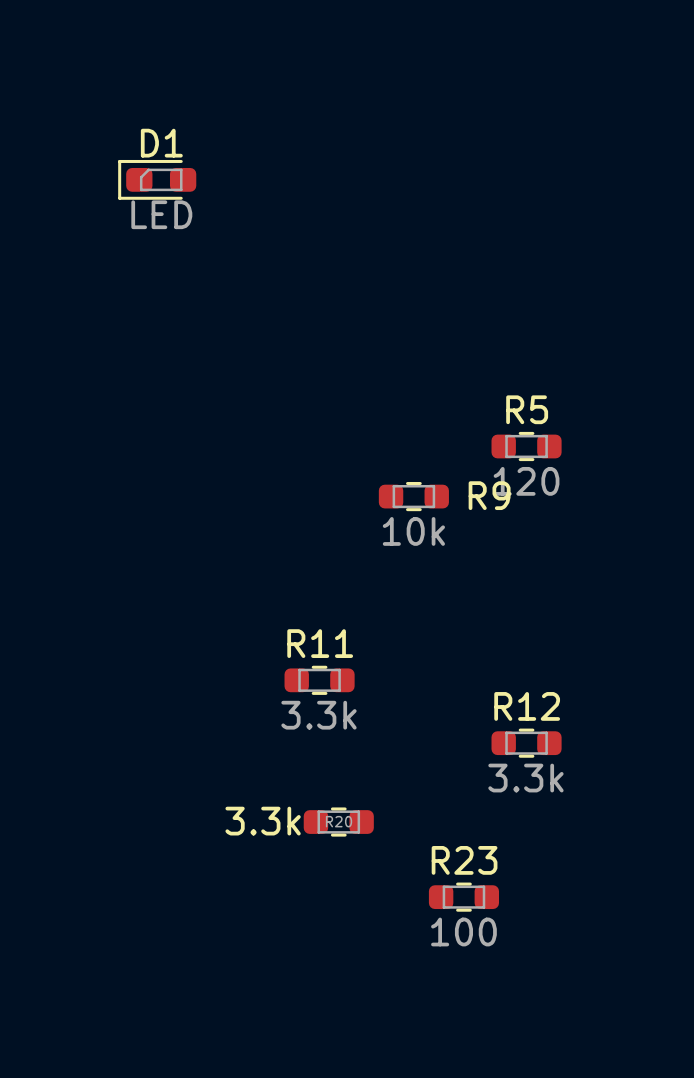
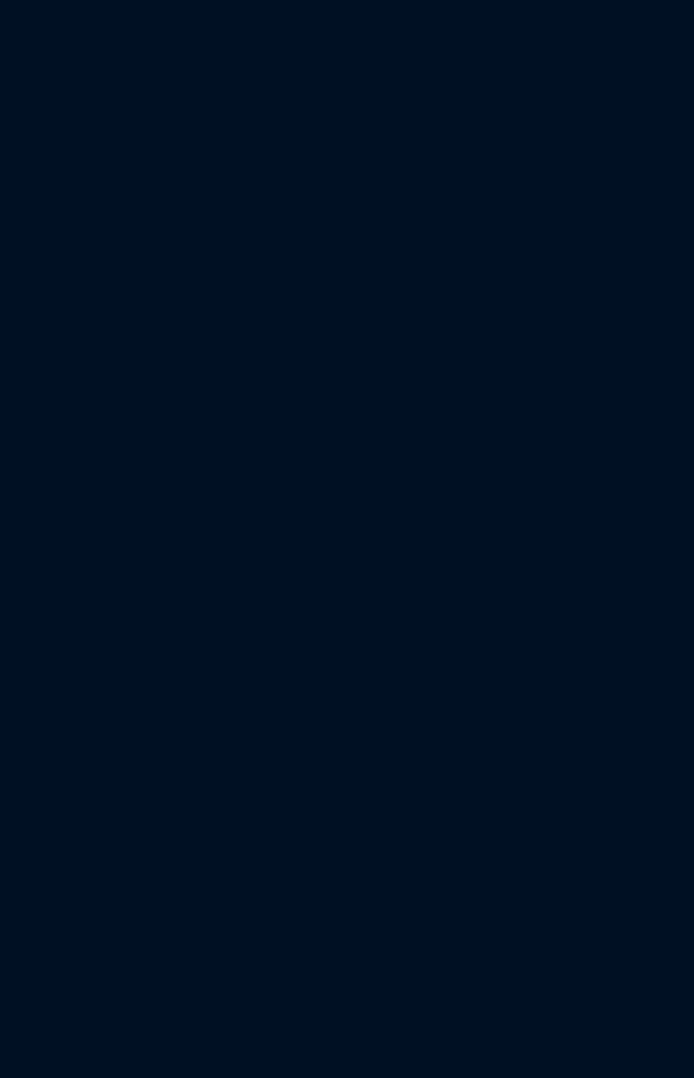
D1: LED (157, 179) -> none
R5: 120 (526, 446) -> none
R9: 10k (413, 496) -> none
R11: 3.3k (319, 680) -> none
R12: 3.3k (526, 743) -> none
R20: 3.3k (338, 822) -> none
R23: 100 (463, 897) -> none

